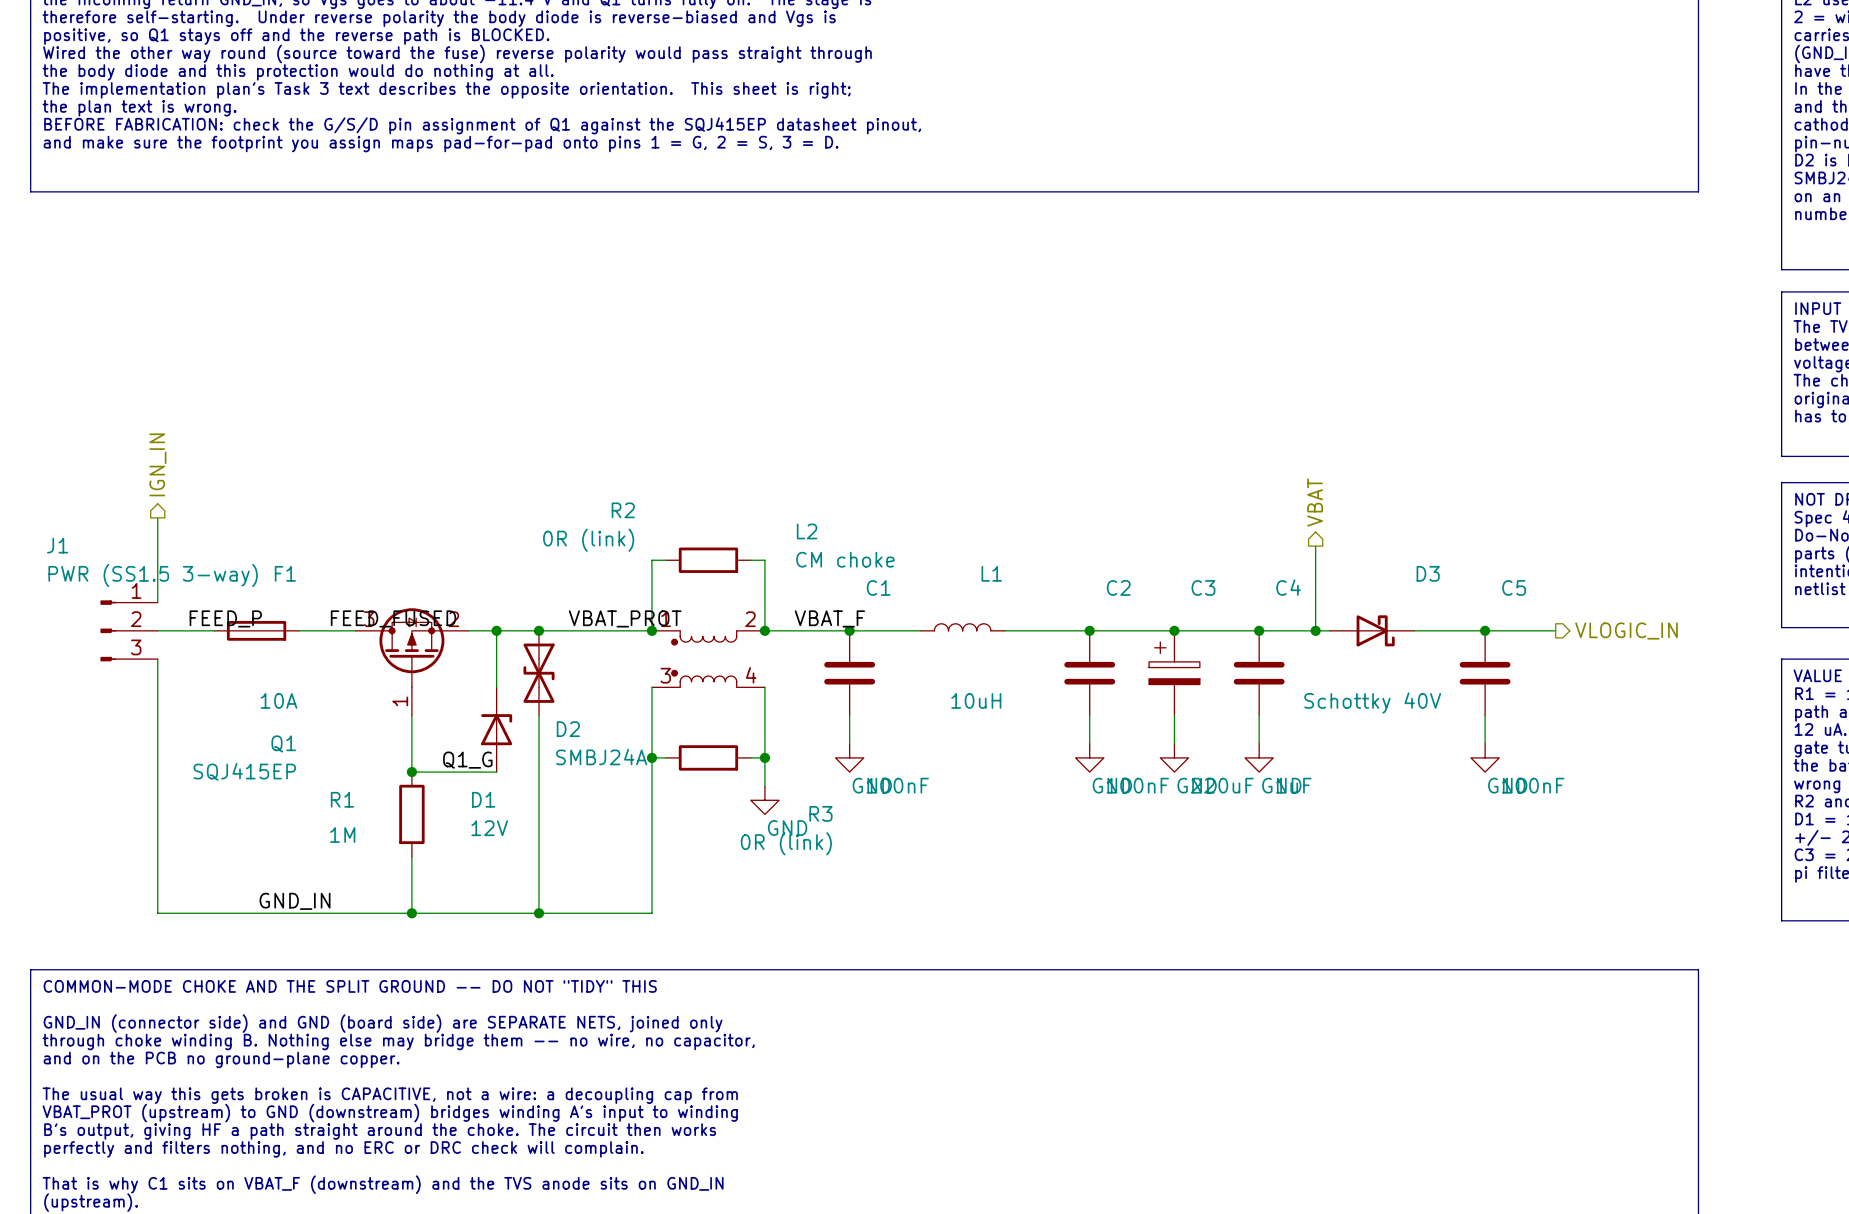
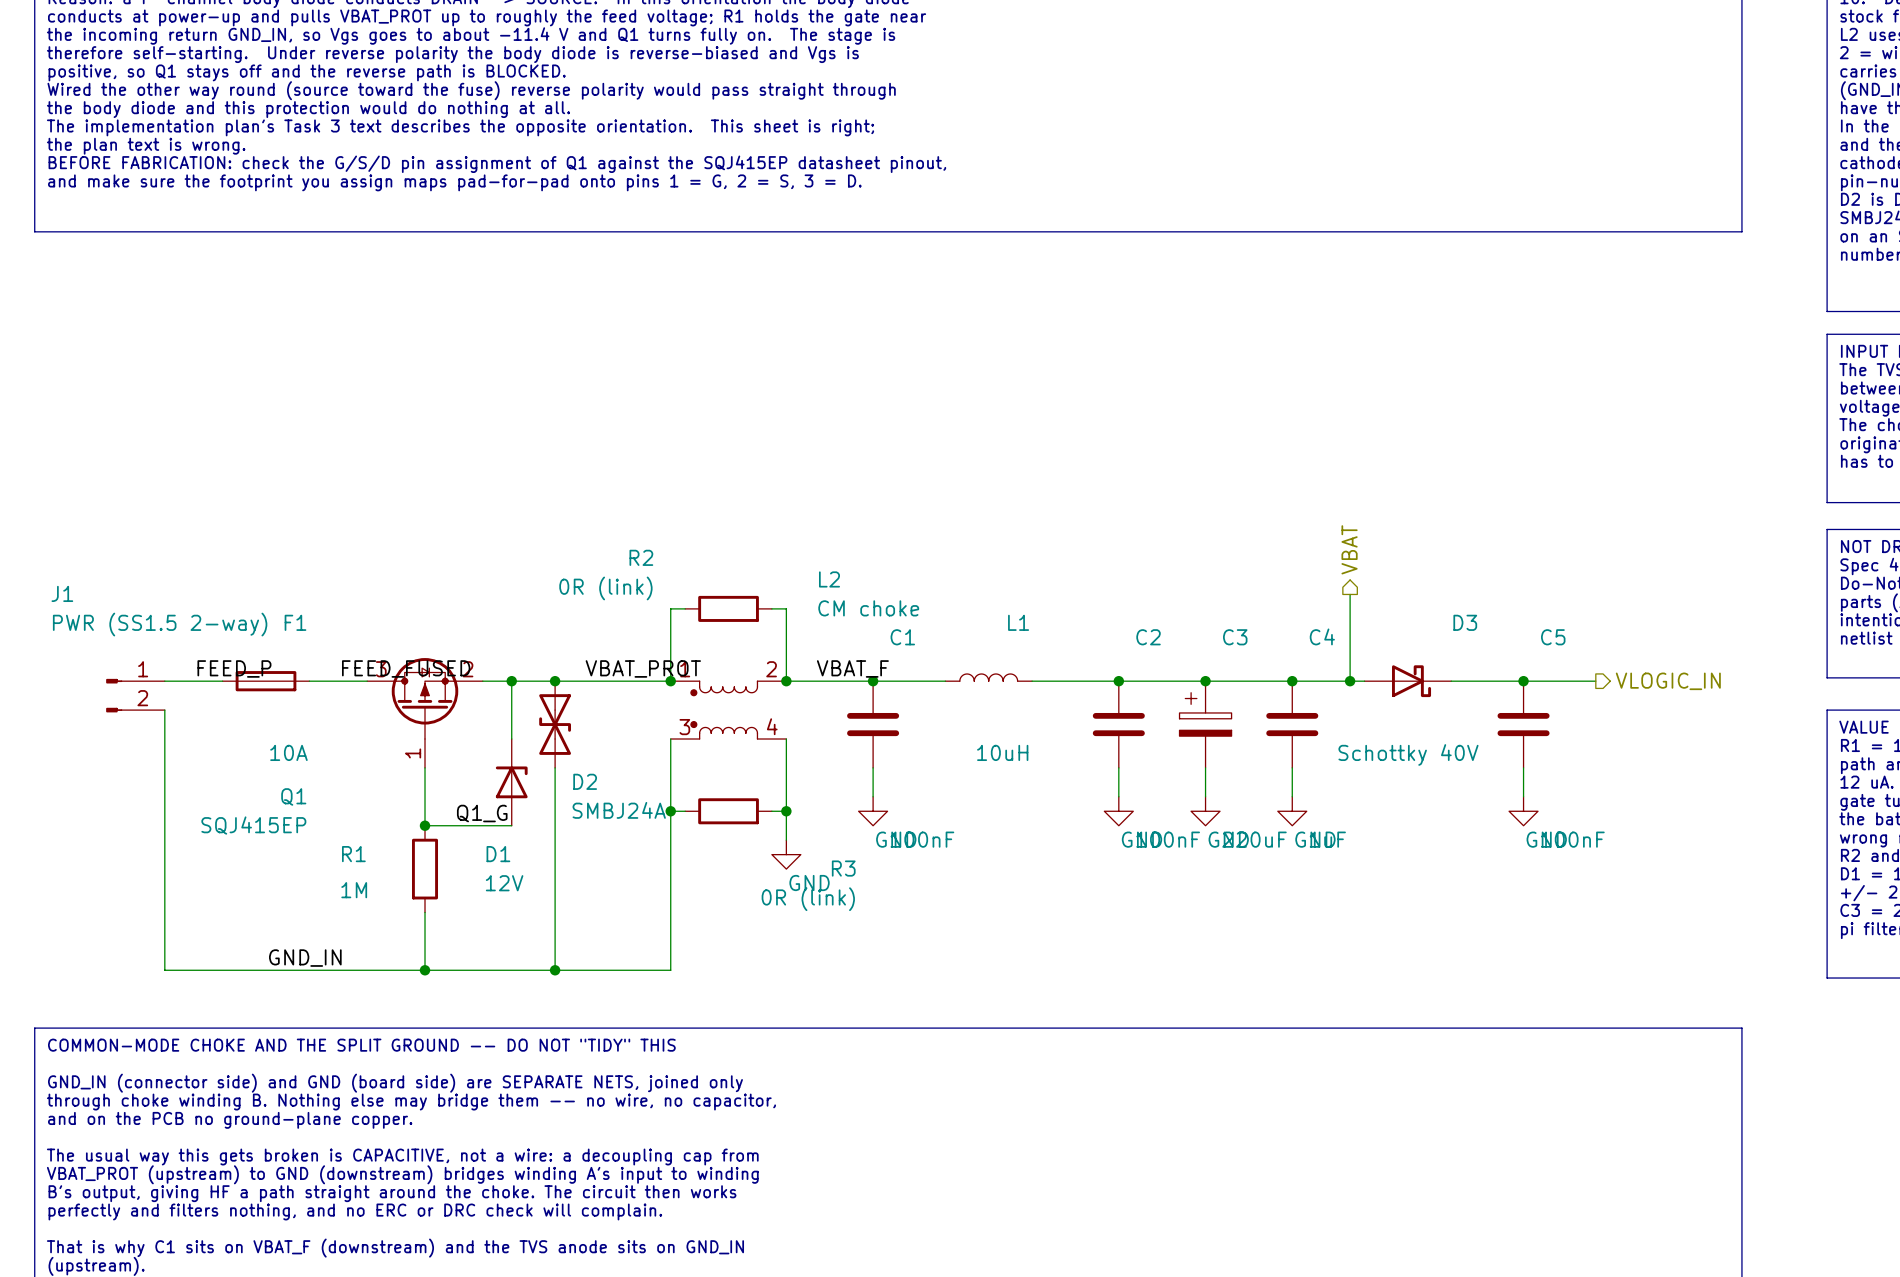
hierarchical label: IGN_IN (157, 464) -> none
wire: (157, 517) (157, 602) -> none
J1 value: PWR (SS1.5 3-way) (153, 575) -> PWR (SS1.5 2-way) (160, 624)
J1 symbol: [100, 600, 158, 662] -> [106, 678, 165, 713]

